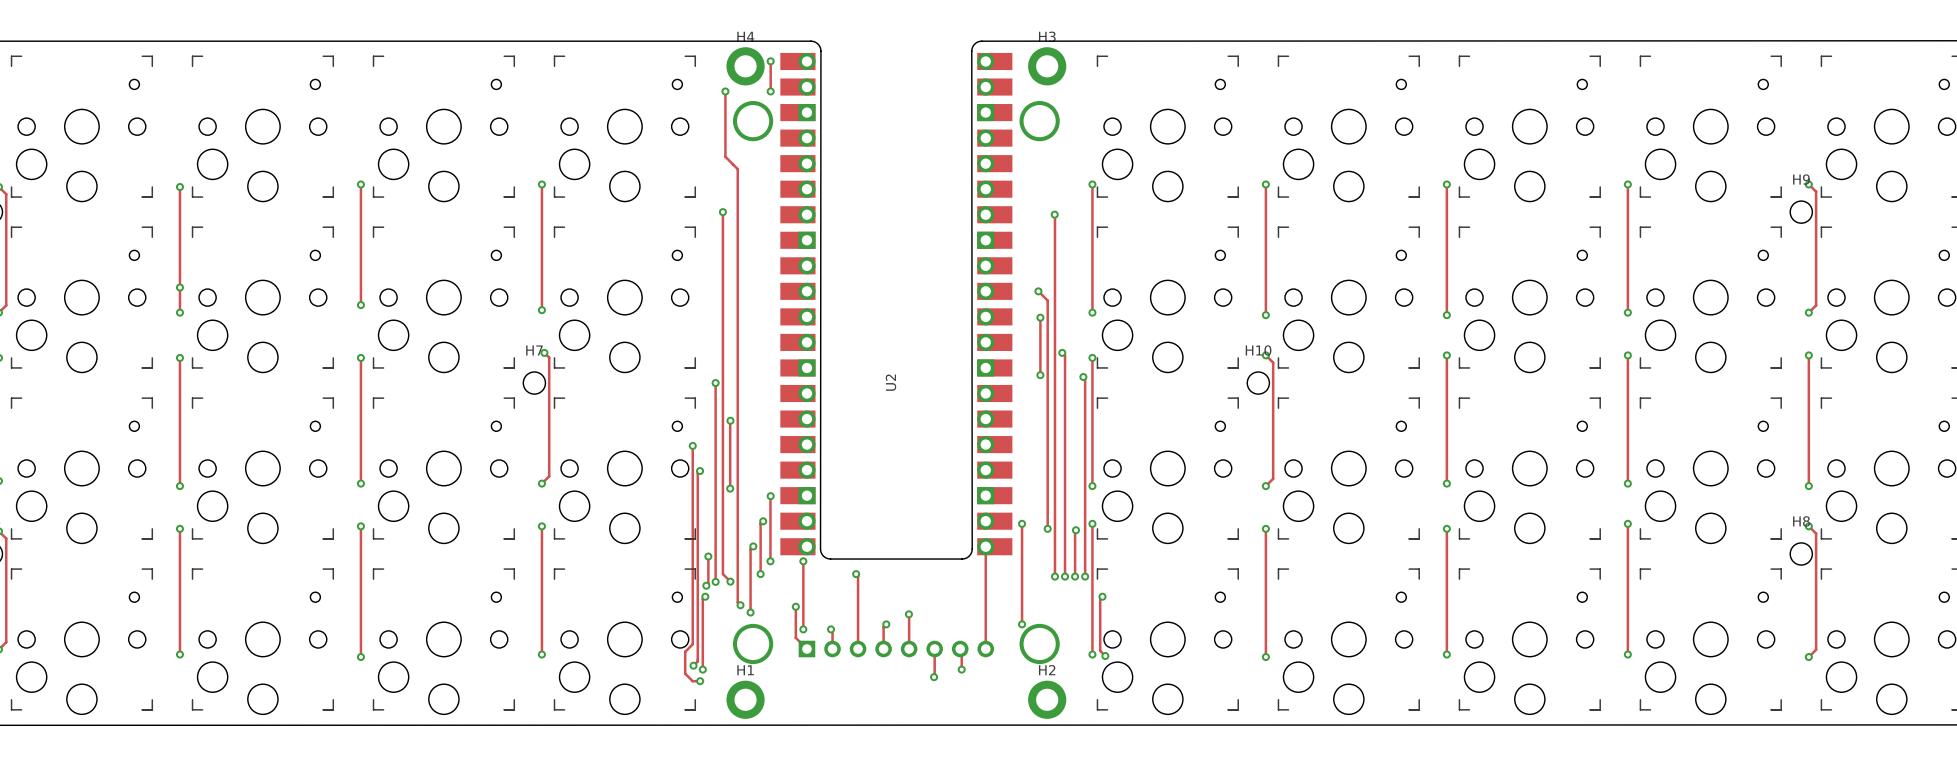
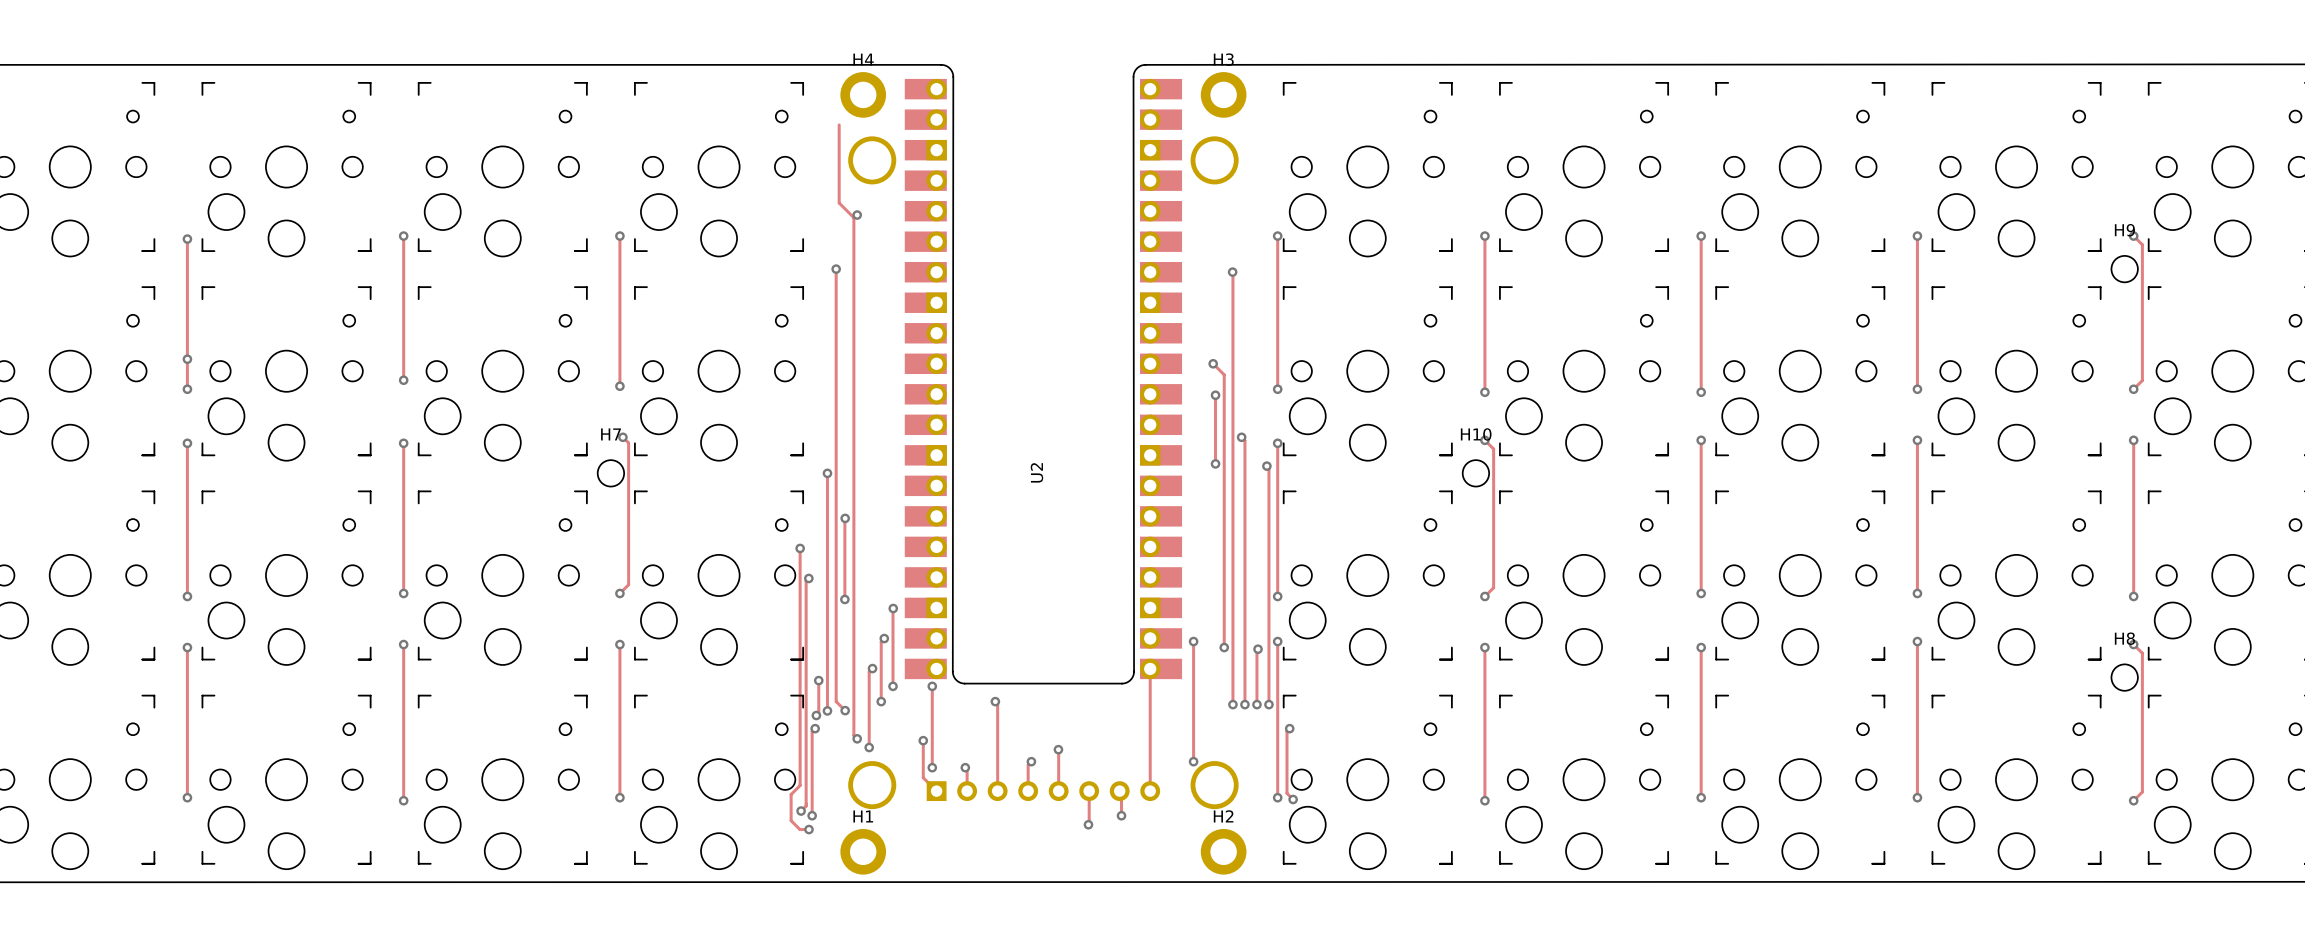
track: (770, 61) (770, 91) -> none
via: (770, 61) -> none
via: (725, 91) -> none
via: (770, 91) -> none
via: none -> (857, 215)

